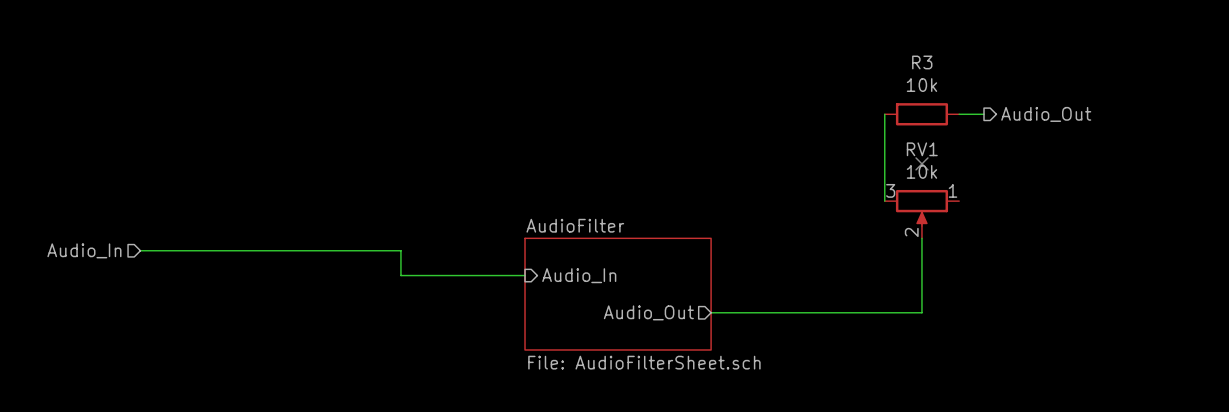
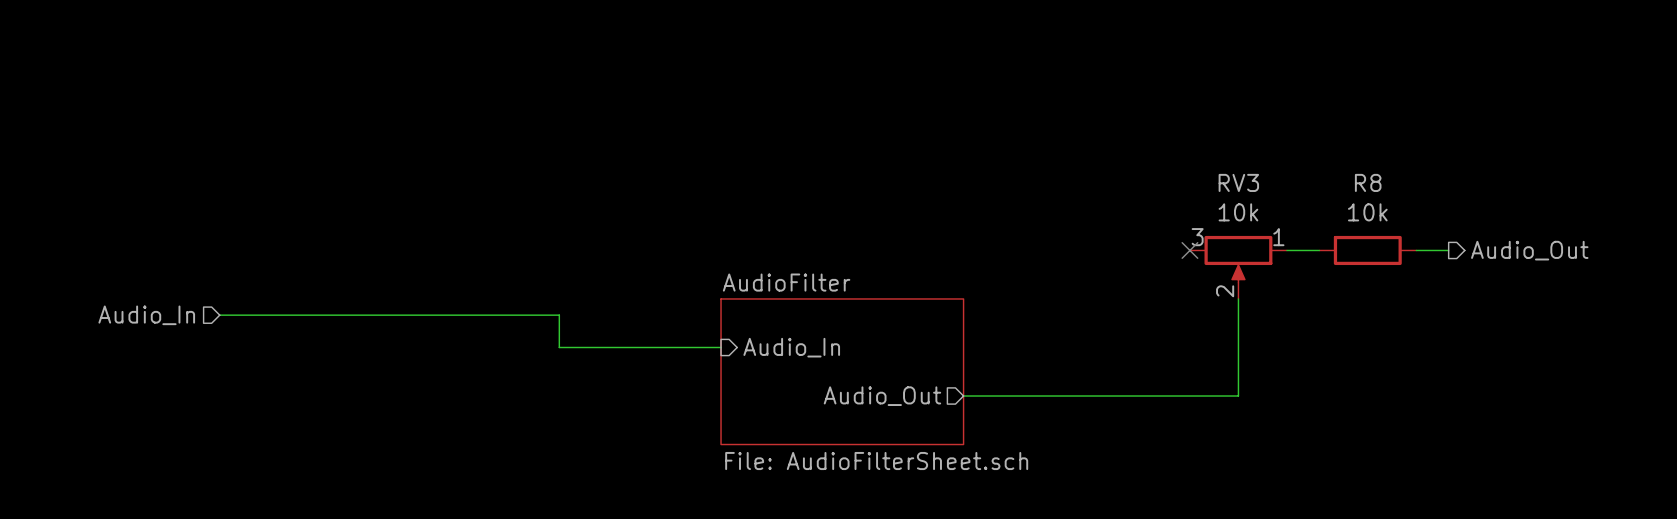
wire: (884, 114) (884, 201) -> none
R3: 10k (921, 114) -> none
wire: (959, 114) (984, 114) -> (1286, 250) (1319, 250)
hierarchical label position: Audio_Out (1046, 114) -> Audio_Out (1529, 250)
RV1 name: RV1 (922, 149) -> RV3 (1238, 182)
no-connect mark position: (921, 163) -> (1189, 250)
R8: none -> 10k (1367, 250)
wire: none -> (1416, 250) (1448, 250)

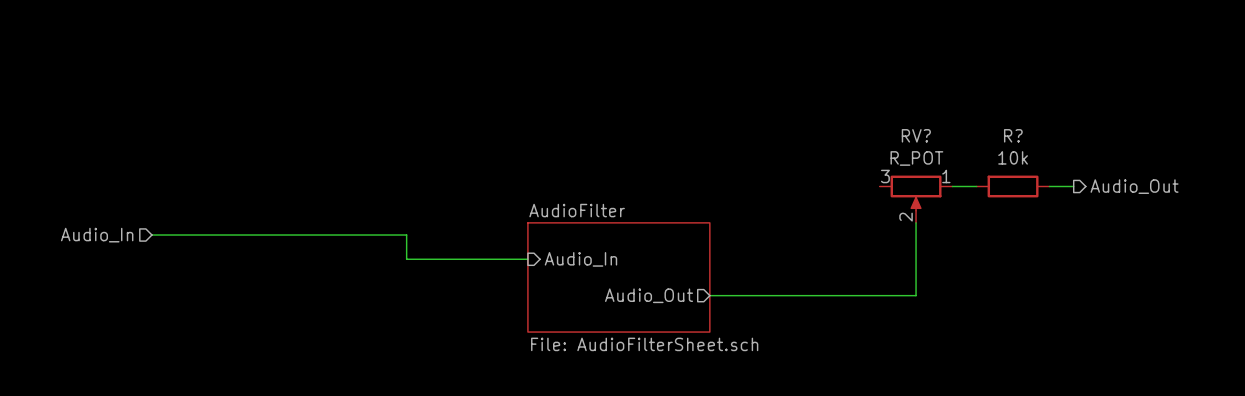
RV3 name: RV3 (1238, 182) -> RV? (916, 135)
R8 name: R8 (1368, 182) -> R? (1013, 135)
RV3 value: 10k (1238, 212) -> R_POT (916, 158)
no-connect mark: (1189, 250) -> none

